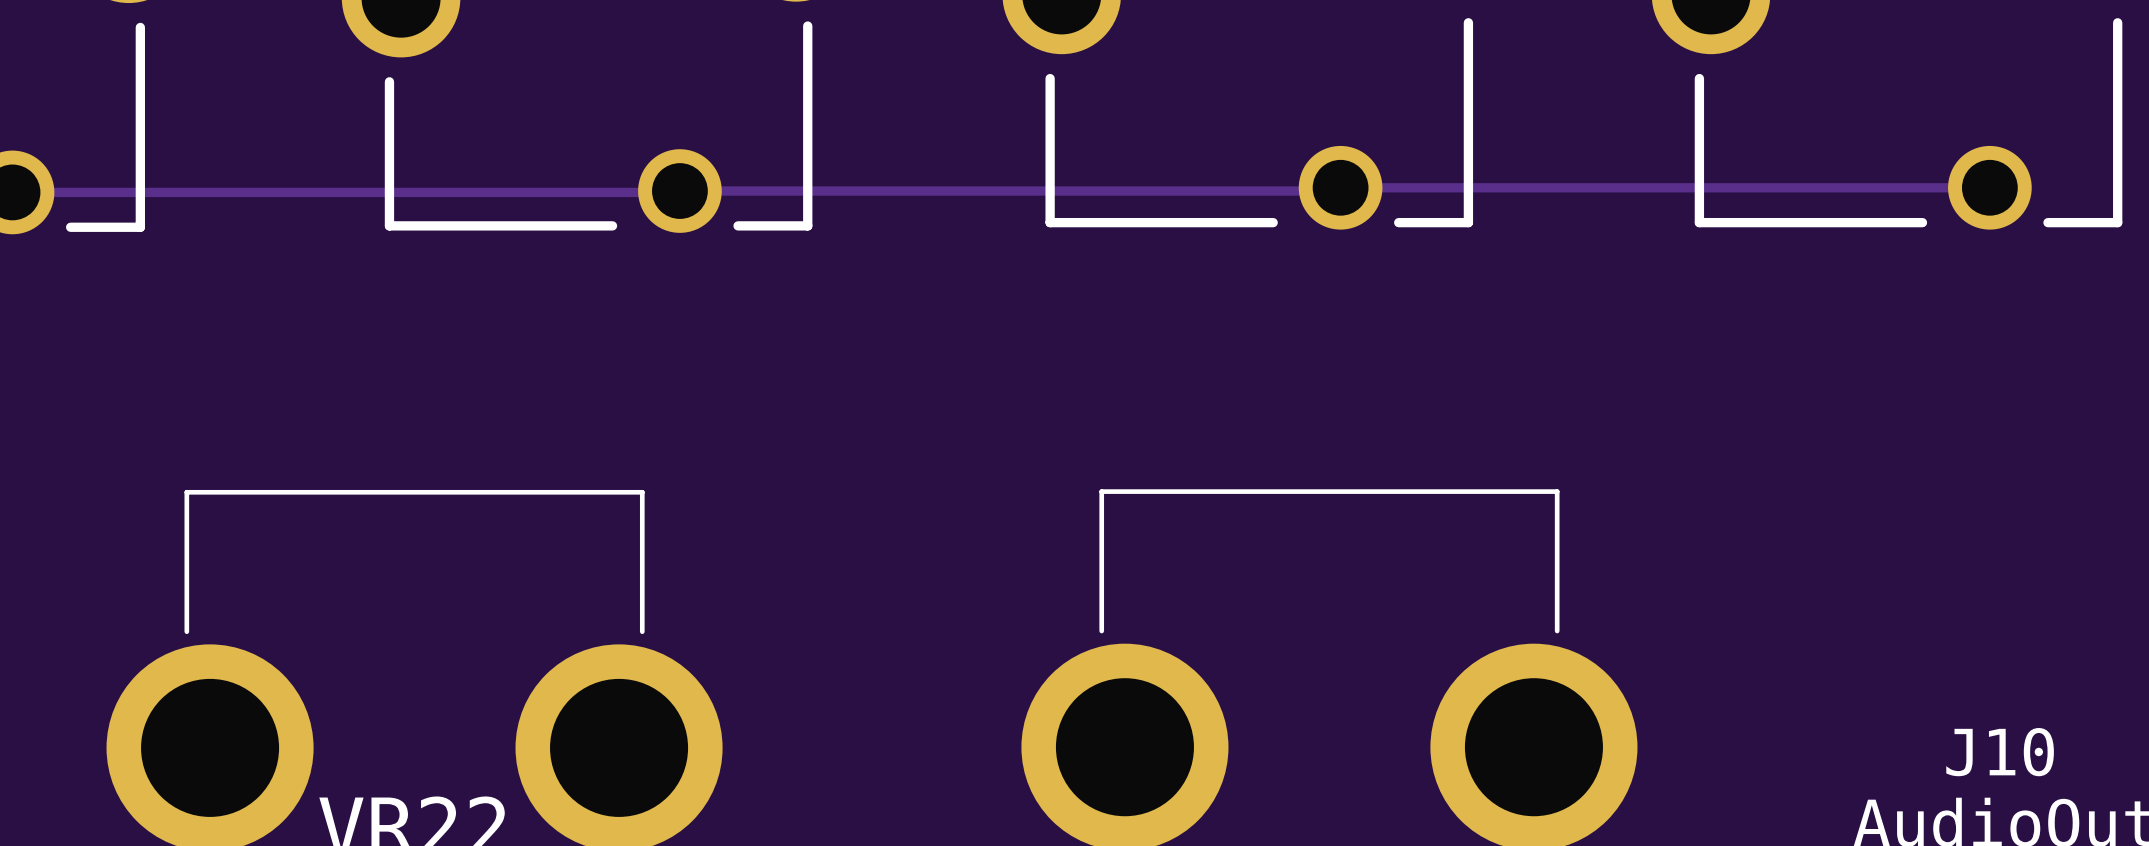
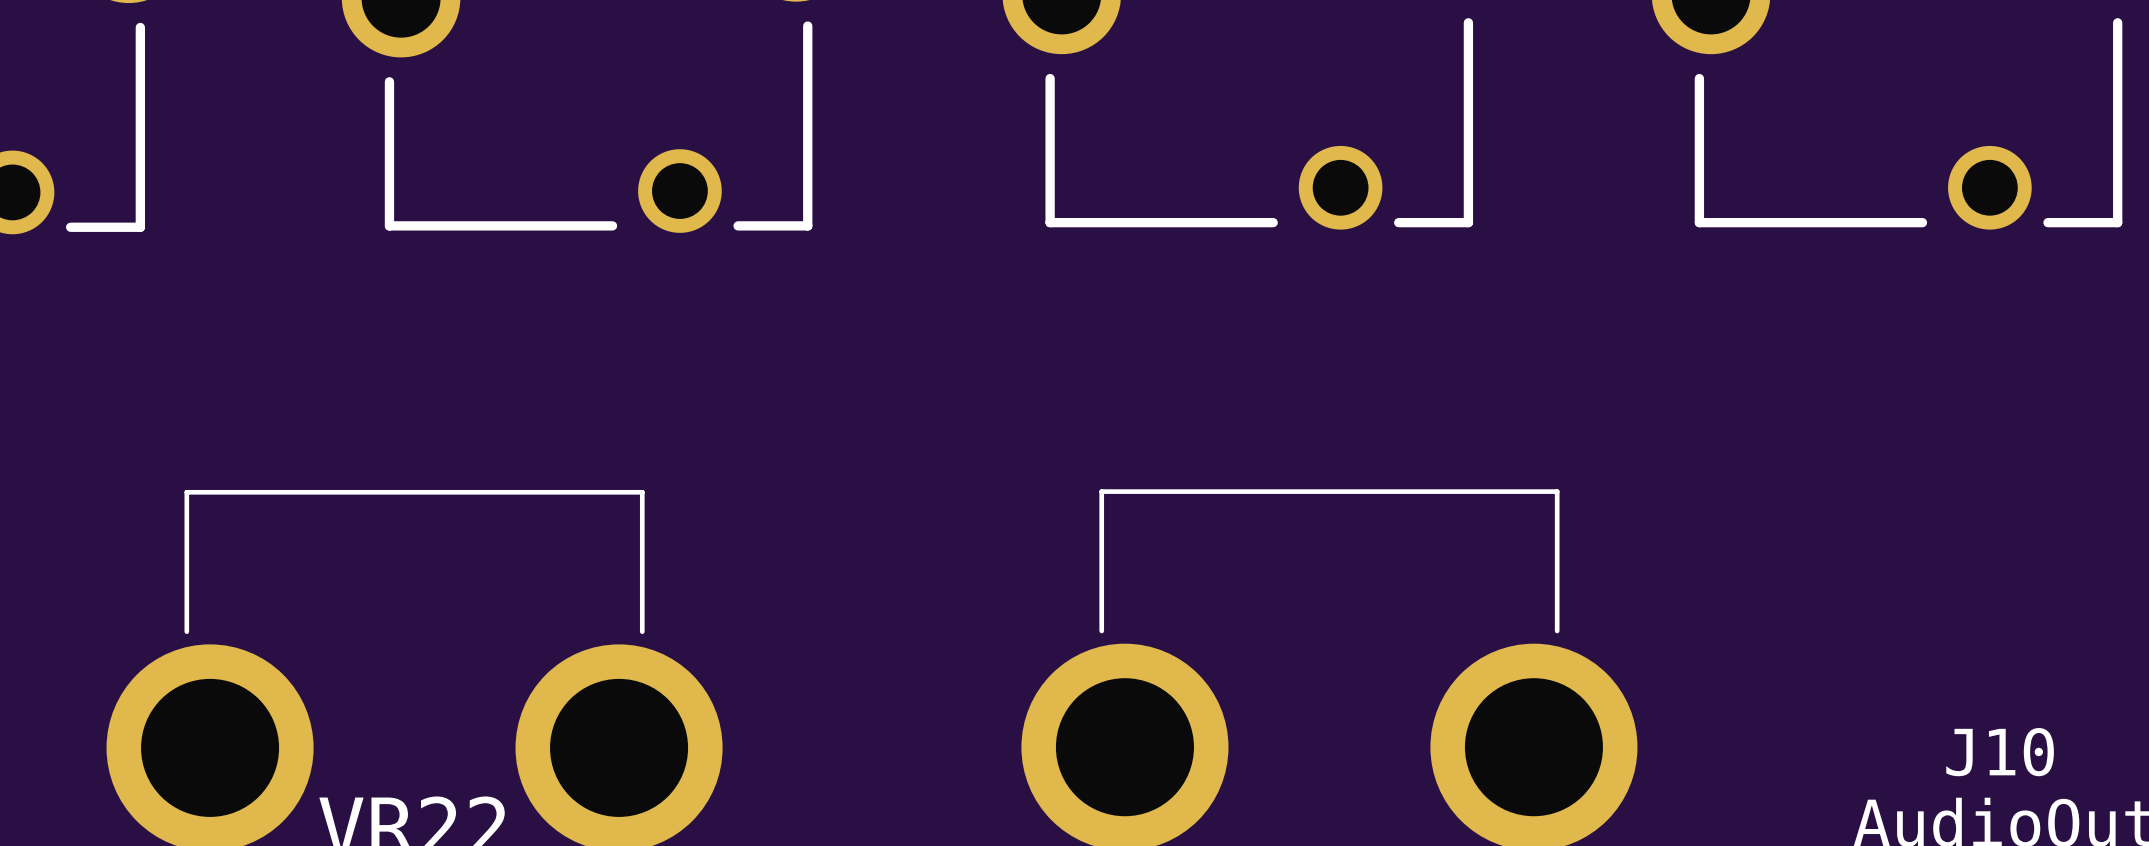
track: (1989, 187) (1340, 187) (1337, 191) (12, 192) -> none

